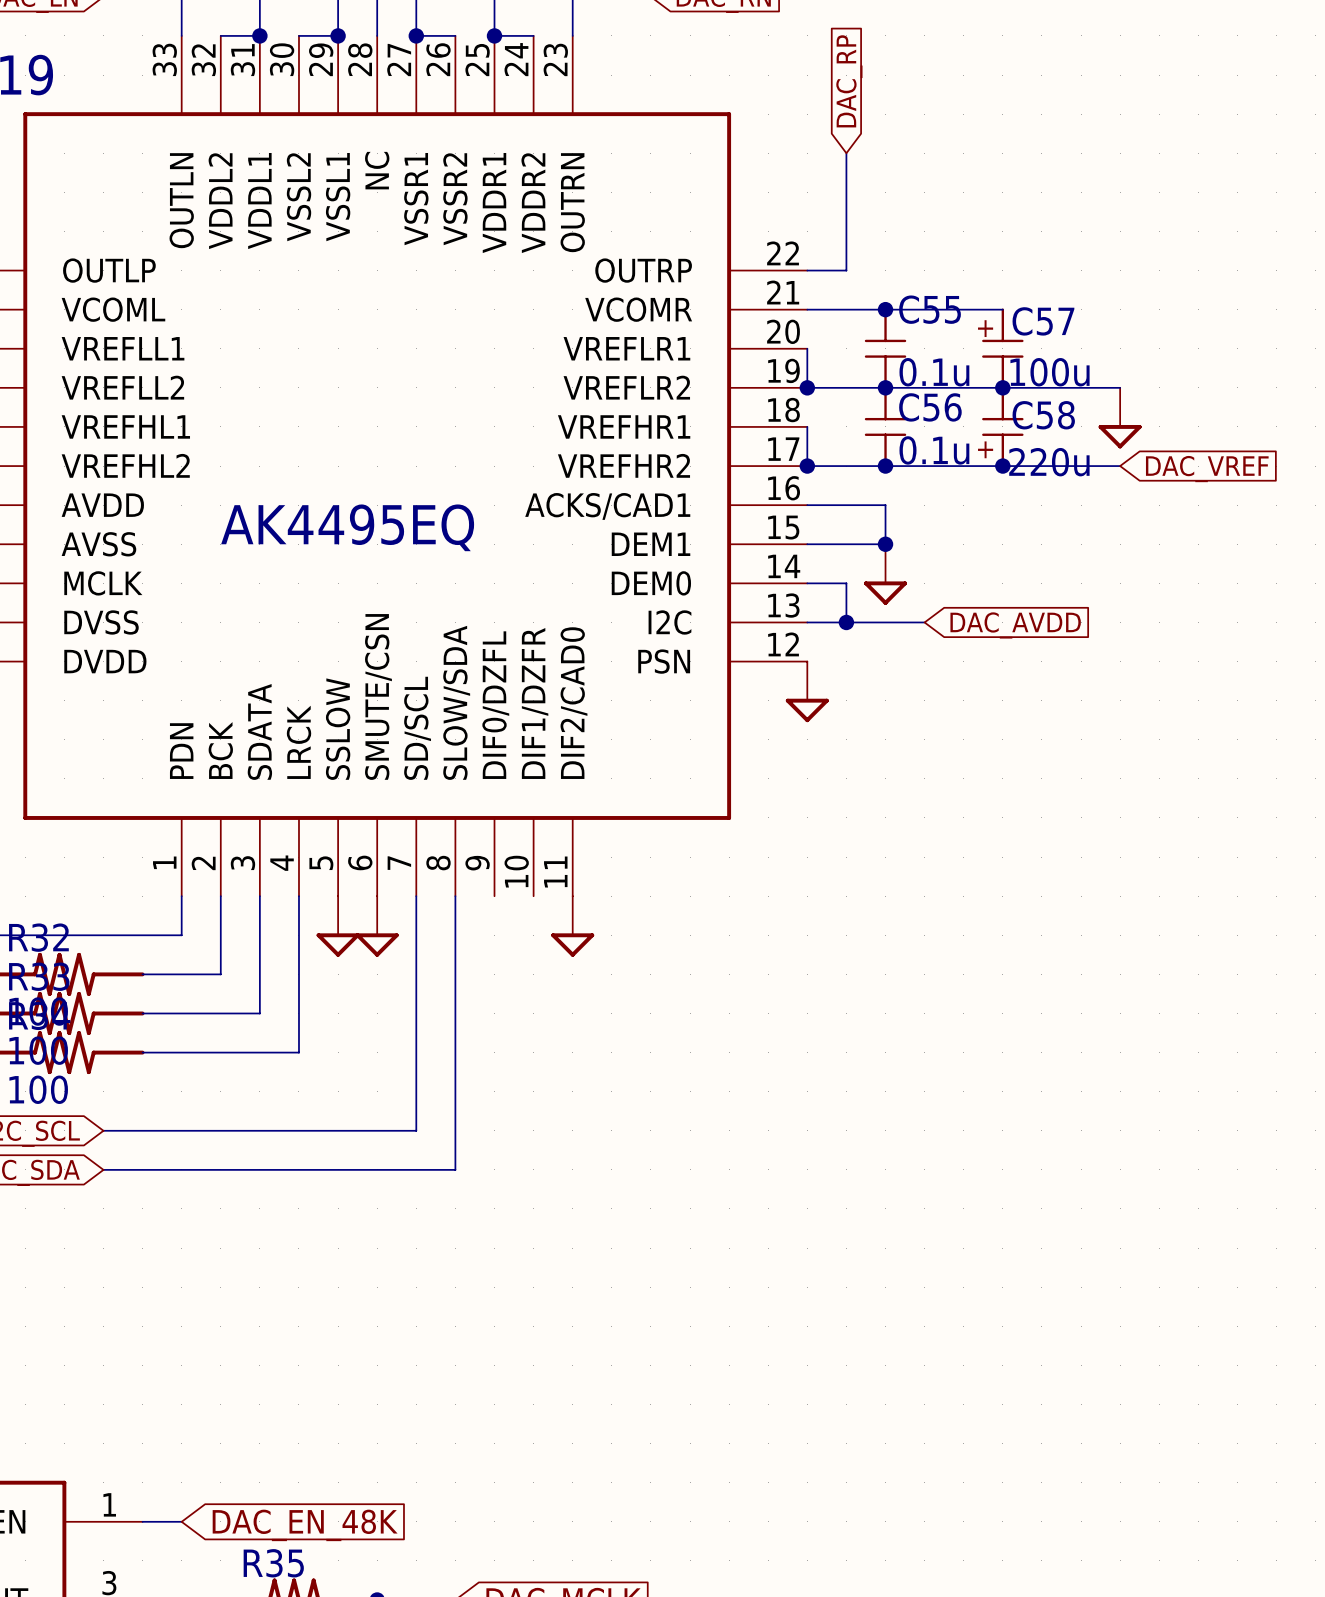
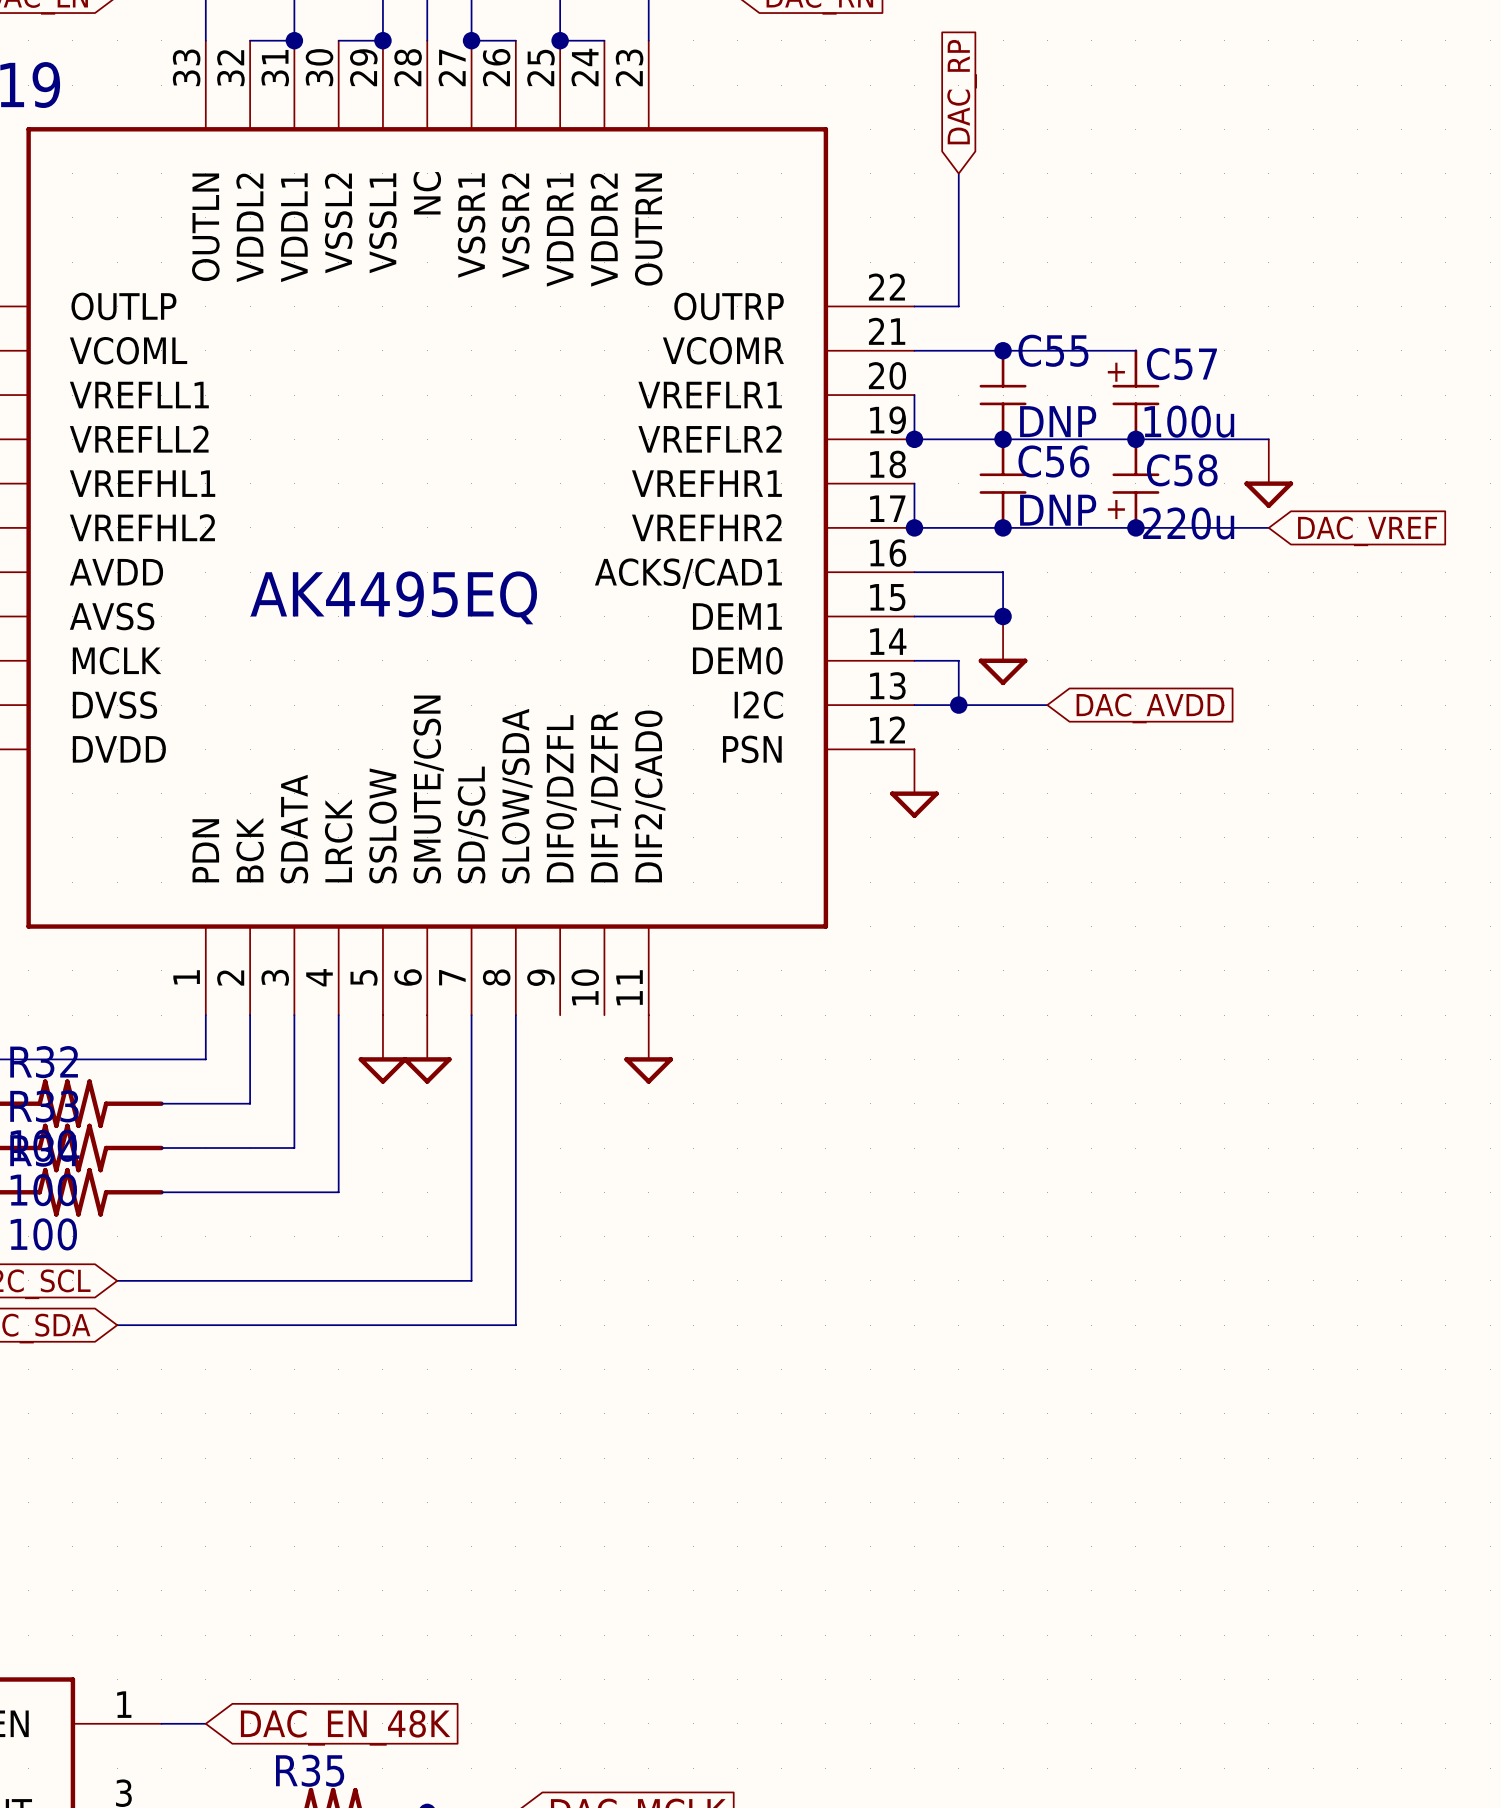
C55 value: 0.1u (934, 372) -> DNP (1058, 421)
C56 value: 0.1u (934, 450) -> DNP (1058, 510)

